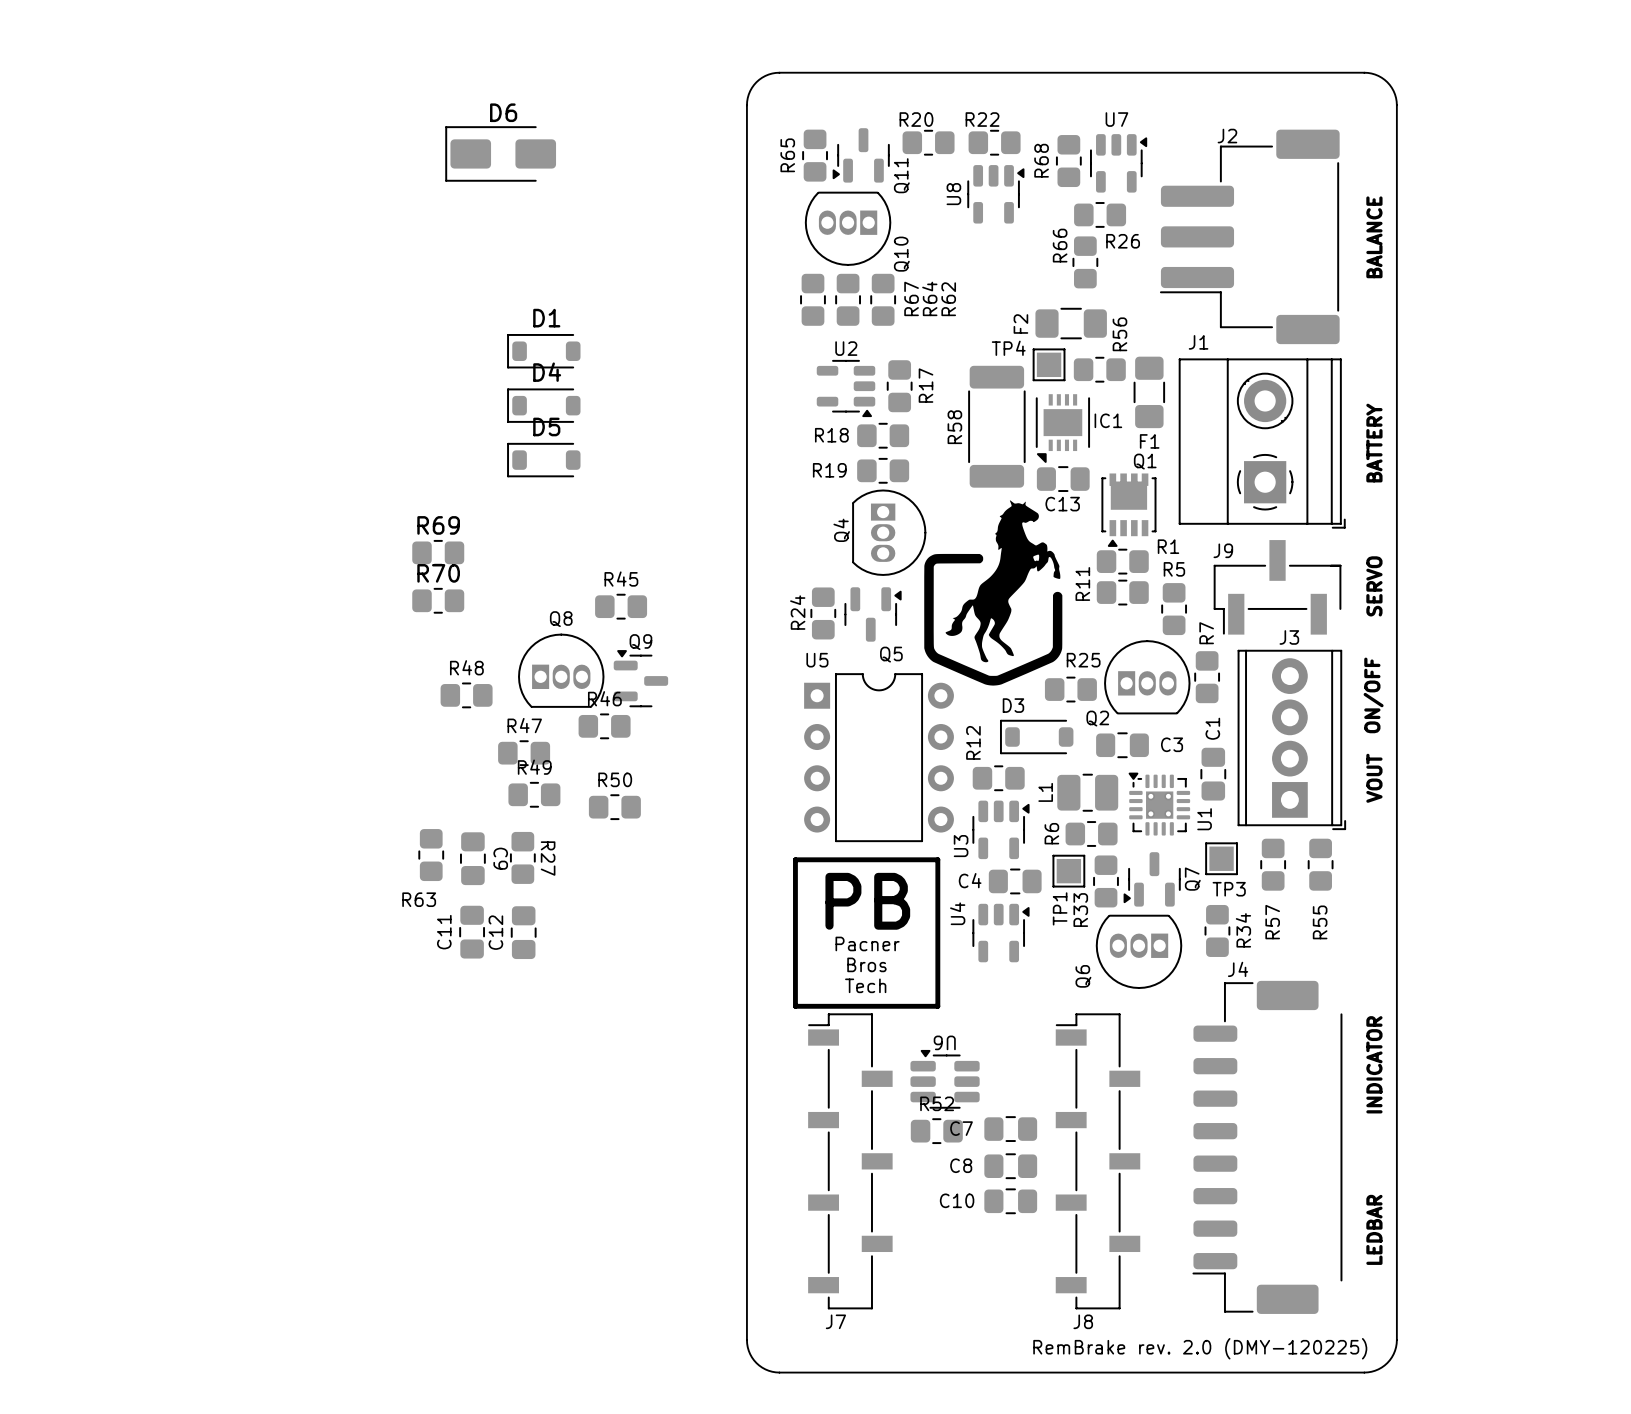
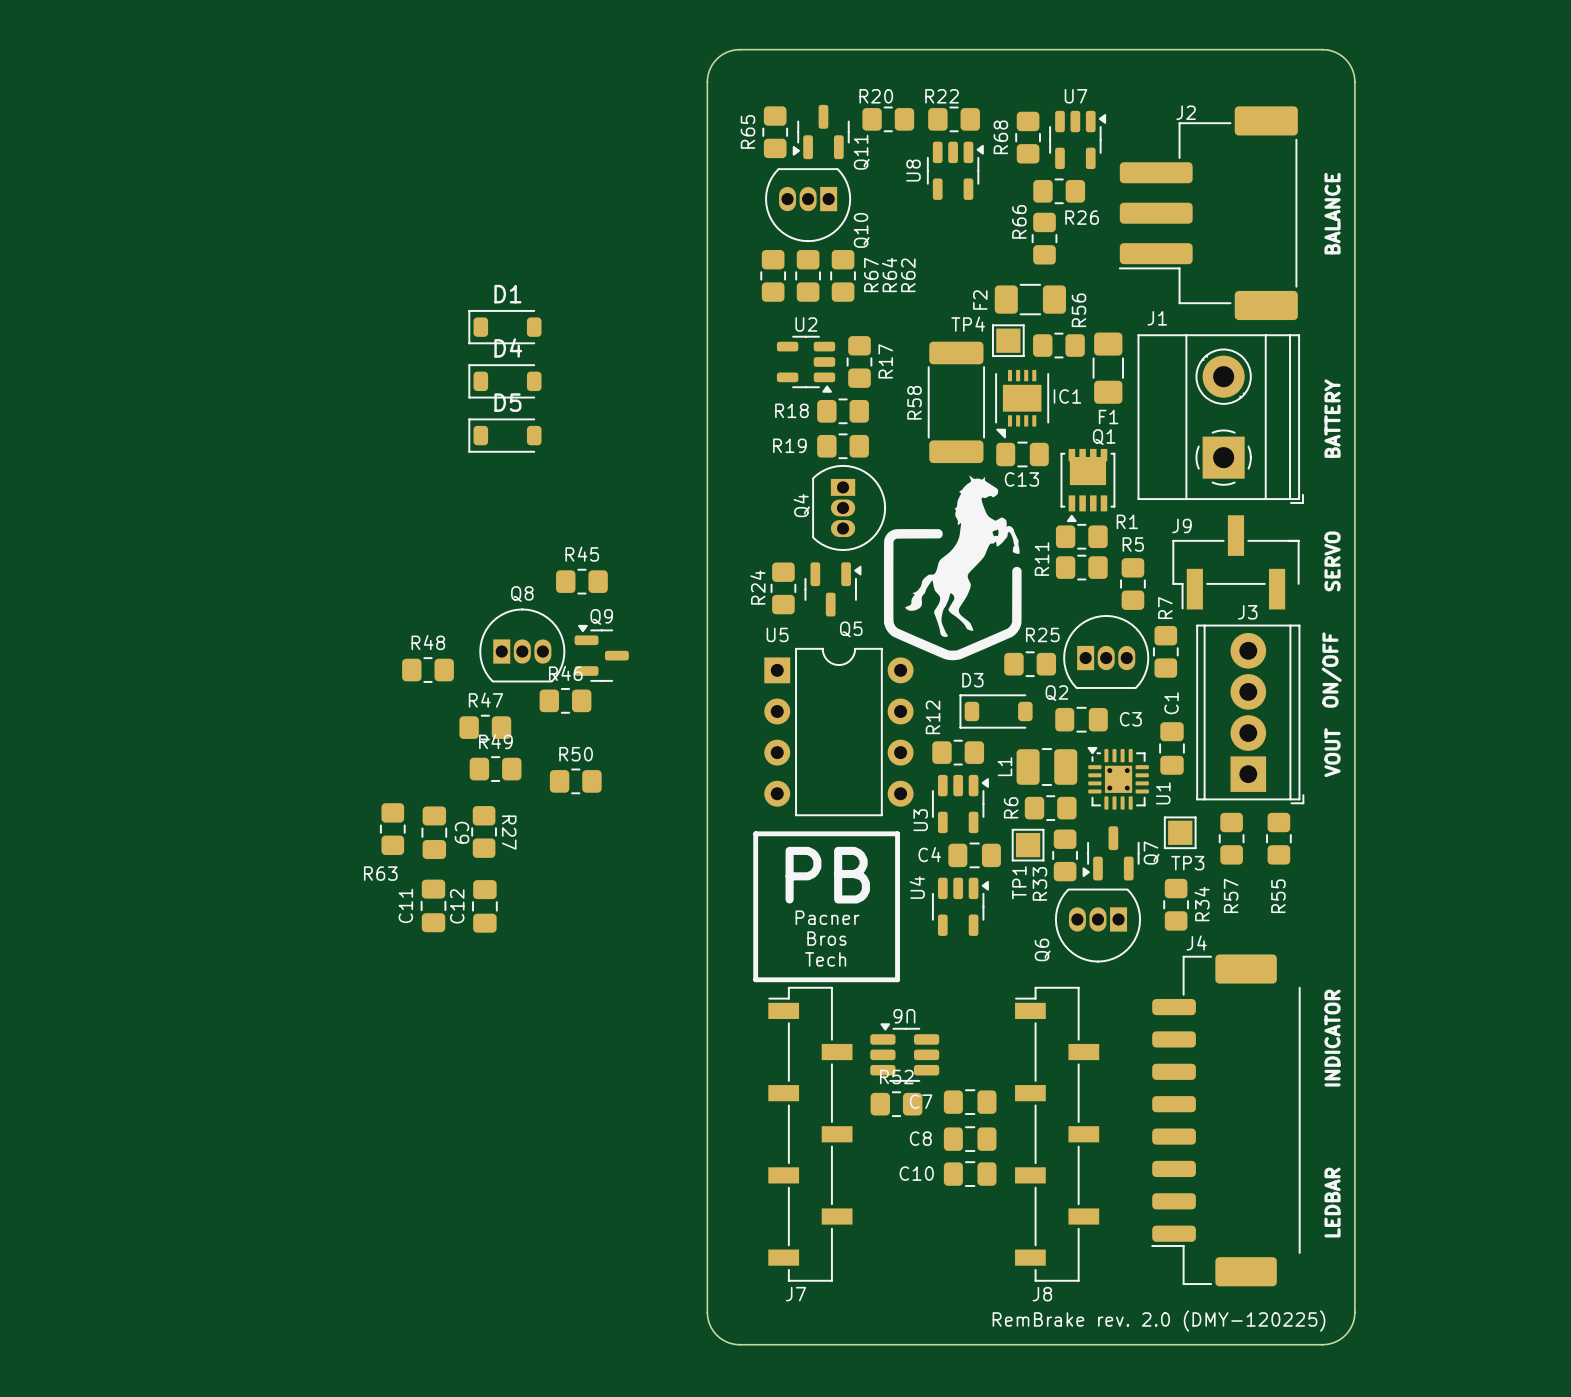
D6: (500, 153) -> none
R69: (438, 552) -> none
R70: (438, 600) -> none

